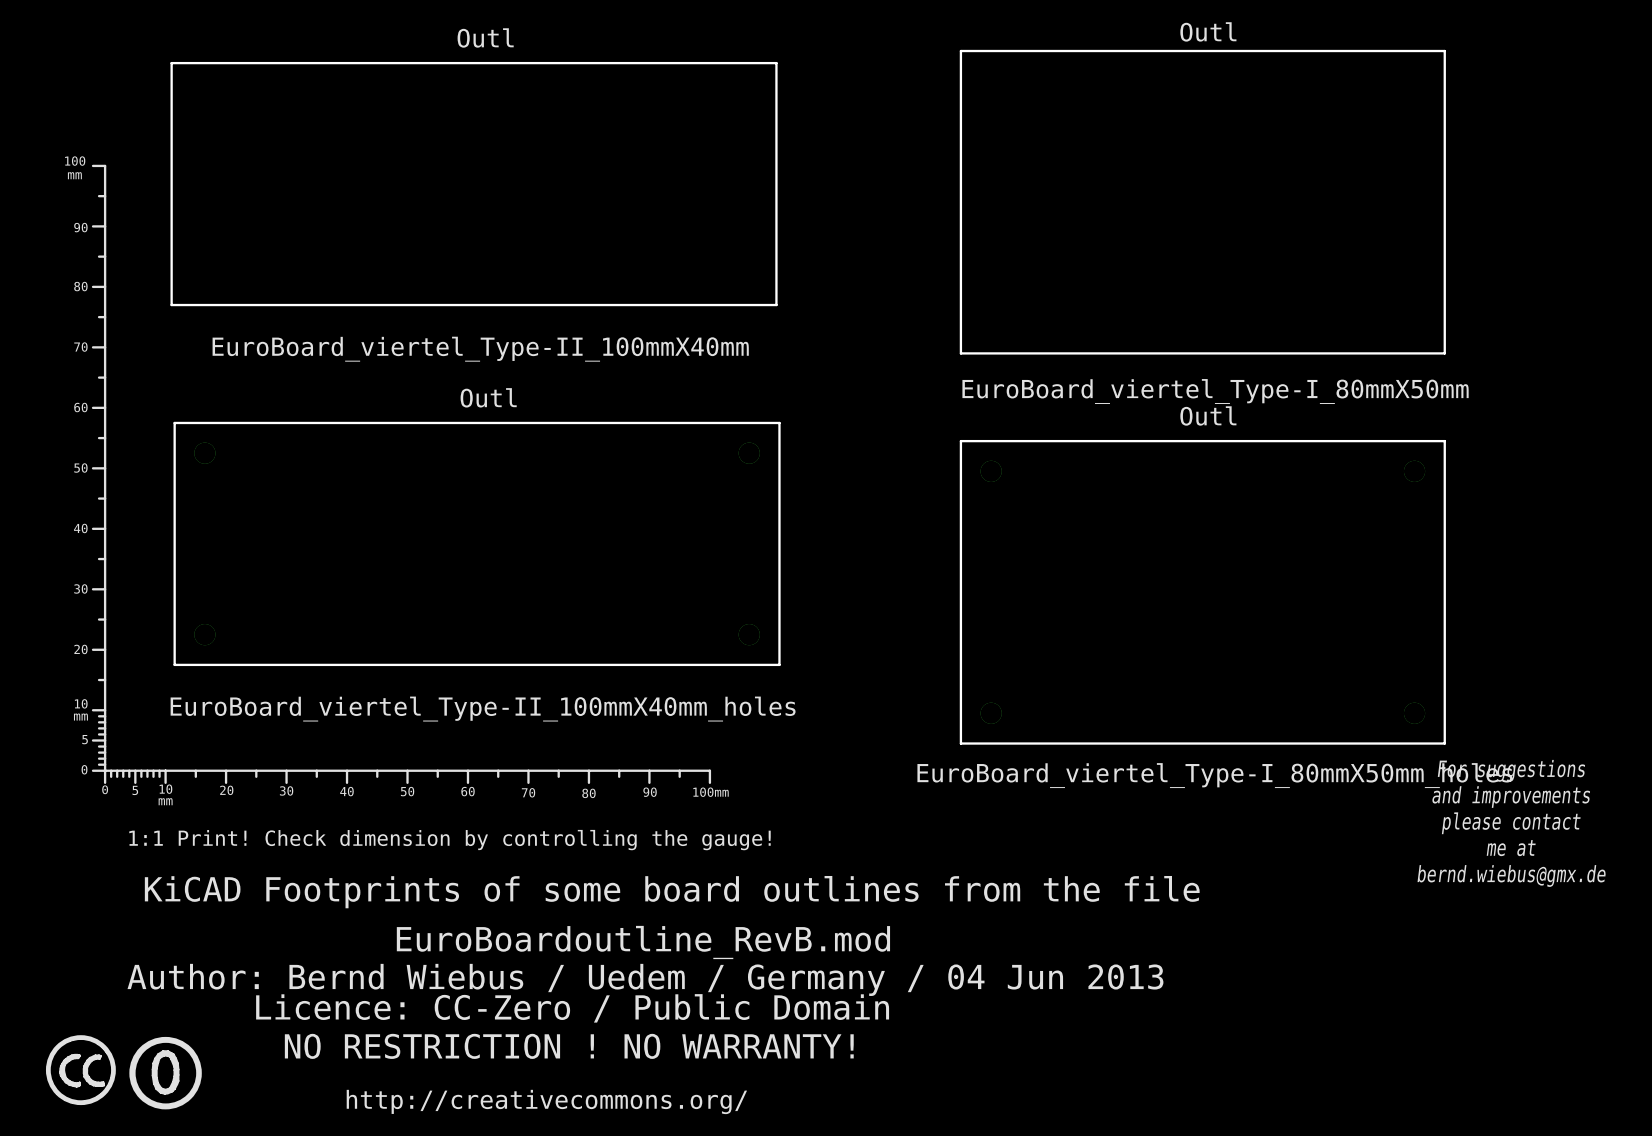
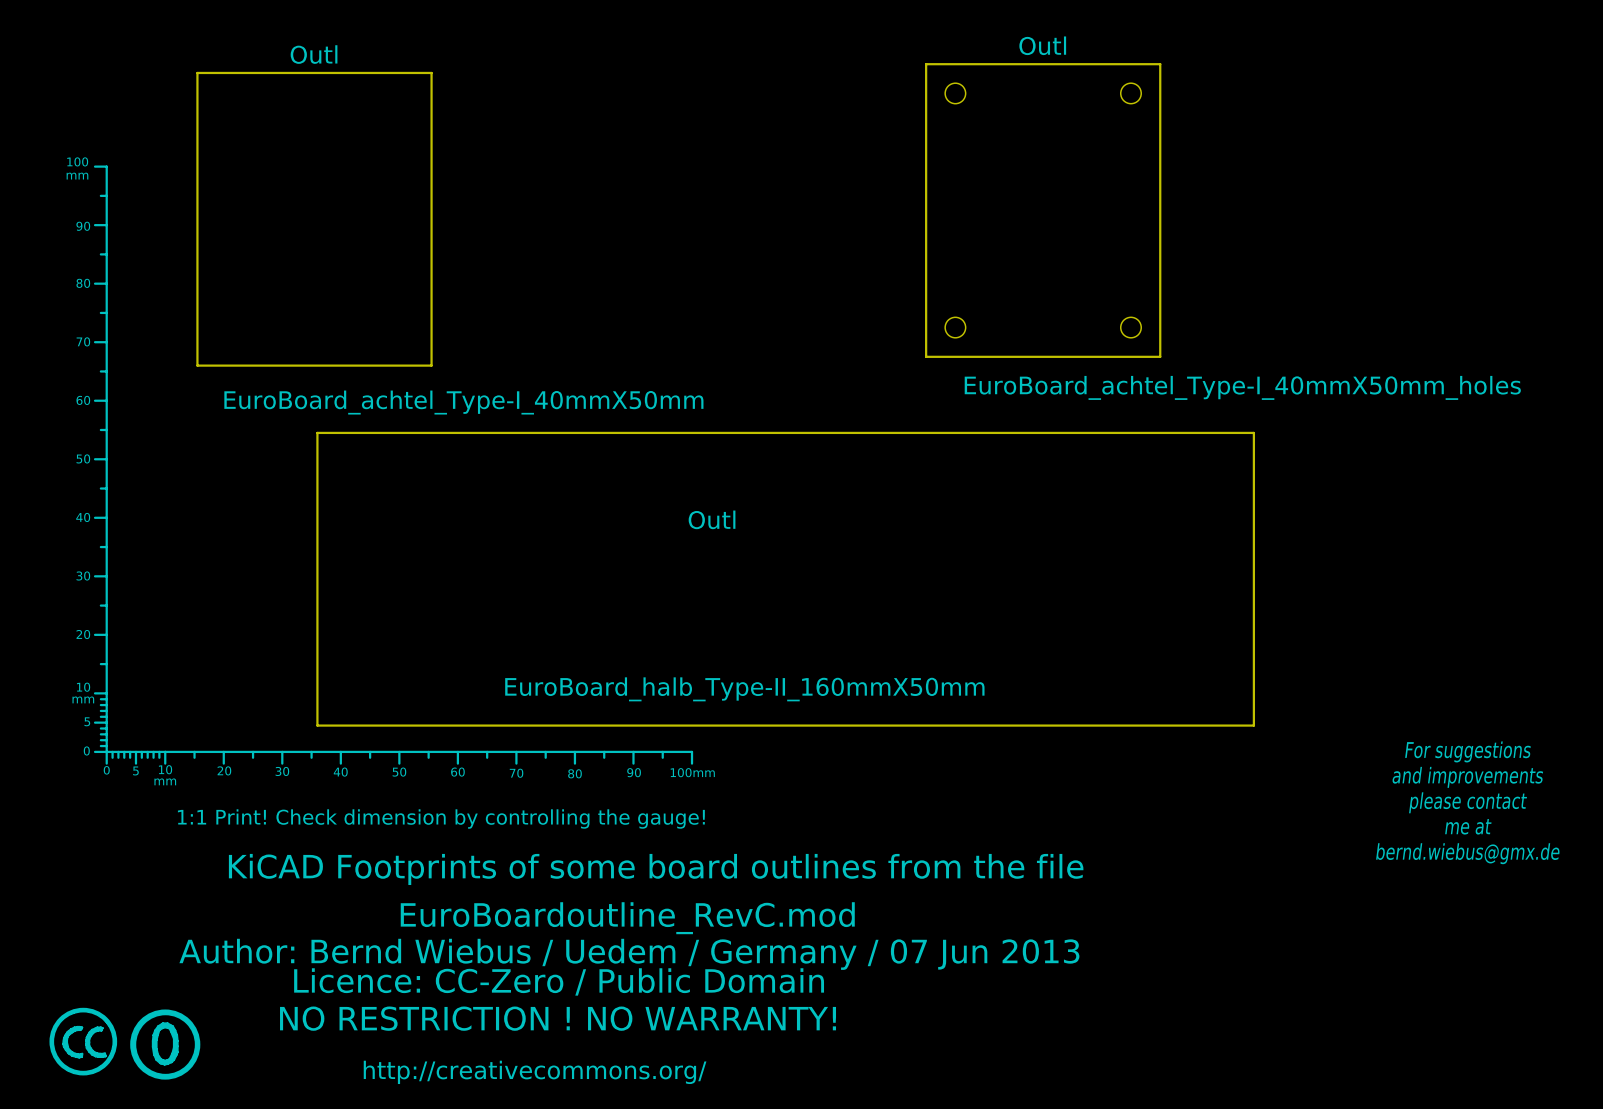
Outl: EuroBoard_viertel_Type-II_100mmX40mm (474, 184) -> none
Outl: EuroBoard_viertel_Type-I_80mmX50mm (1202, 202) -> none
Outl: none -> EuroBoard_achtel_Type-I_40mmX50mm_holes (1043, 210)
Outl: none -> EuroBoard_achtel_Type-I_40mmX50mm (314, 219)
Outl: EuroBoard_viertel_Type-II_100mmX40mm_holes (477, 543) -> none
Outl: none -> EuroBoard_halb_Type-II_160mmX50mm (785, 579)
Outl: EuroBoard_viertel_Type-I_80mmX50mm_holes (1202, 592) -> none
text: EuroBoardoutline_RevB.mod (643, 942) -> EuroBoardoutline_RevC.mod (627, 918)
text: Author: Bernd Wiebus / Uedem / Germany / 04 Jun 2013 (645, 979) -> Author: Bernd Wiebus / Uedem / Germany / 07 Jun 2013 (629, 954)

